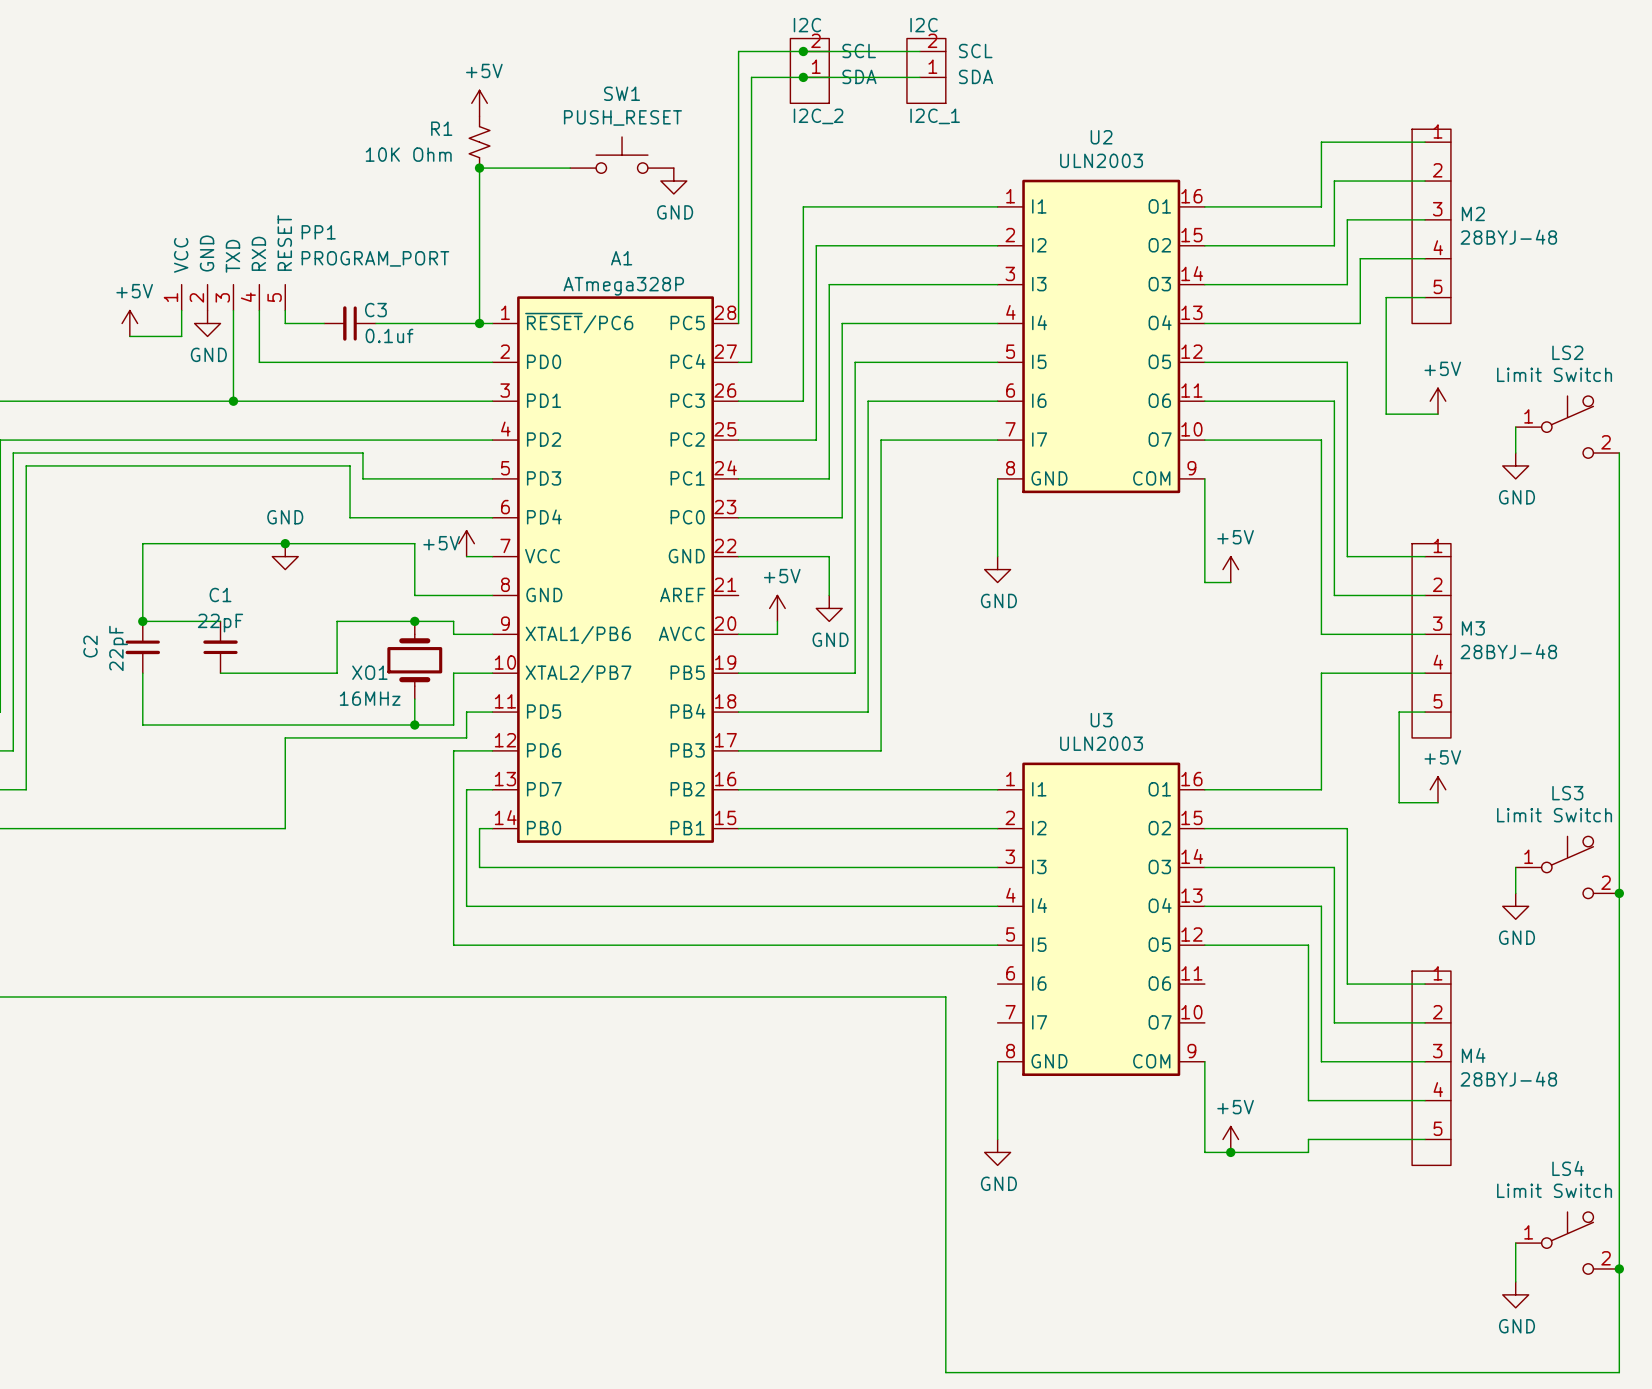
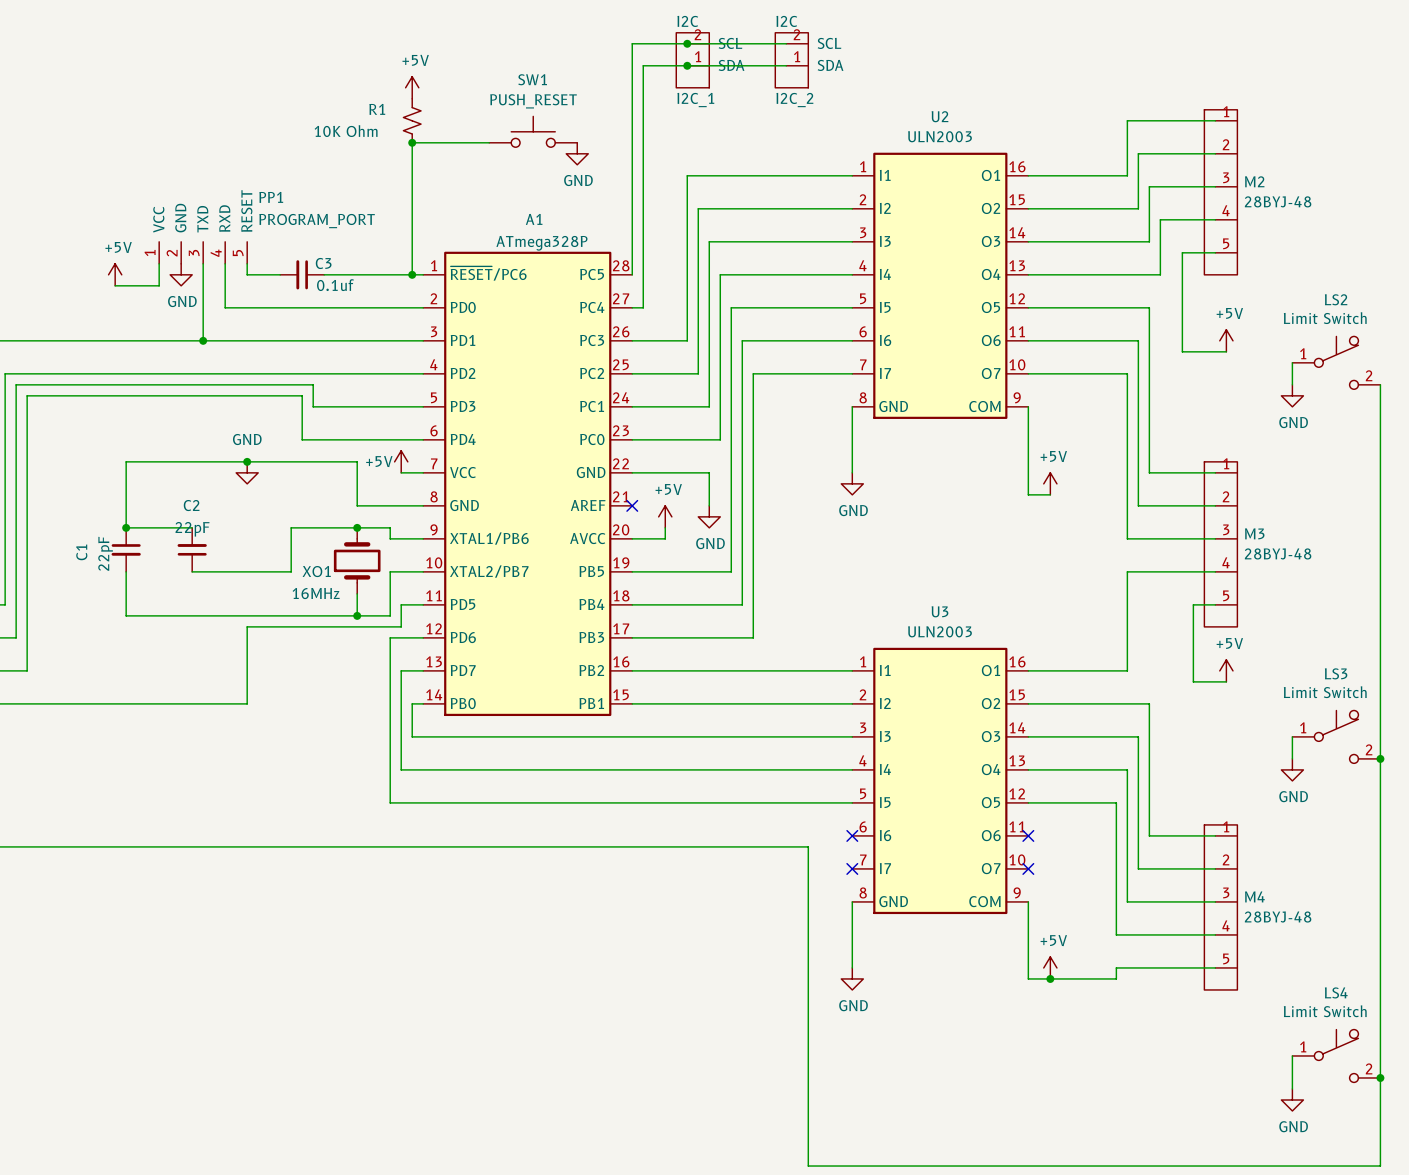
I2C_2 name: I2C_2 (818, 116) -> I2C_1 (695, 100)
I2C_1 name: I2C_1 (935, 116) -> I2C_2 (794, 100)
C1 name: C1 (220, 595) -> C2 (191, 505)
no-connect mark: none -> (632, 505)
C2 name: C2 (90, 646) -> C1 (81, 552)
no-connect mark: none -> (852, 835)
no-connect mark: none -> (1028, 835)
no-connect mark: none -> (852, 868)
no-connect mark: none -> (1028, 868)

